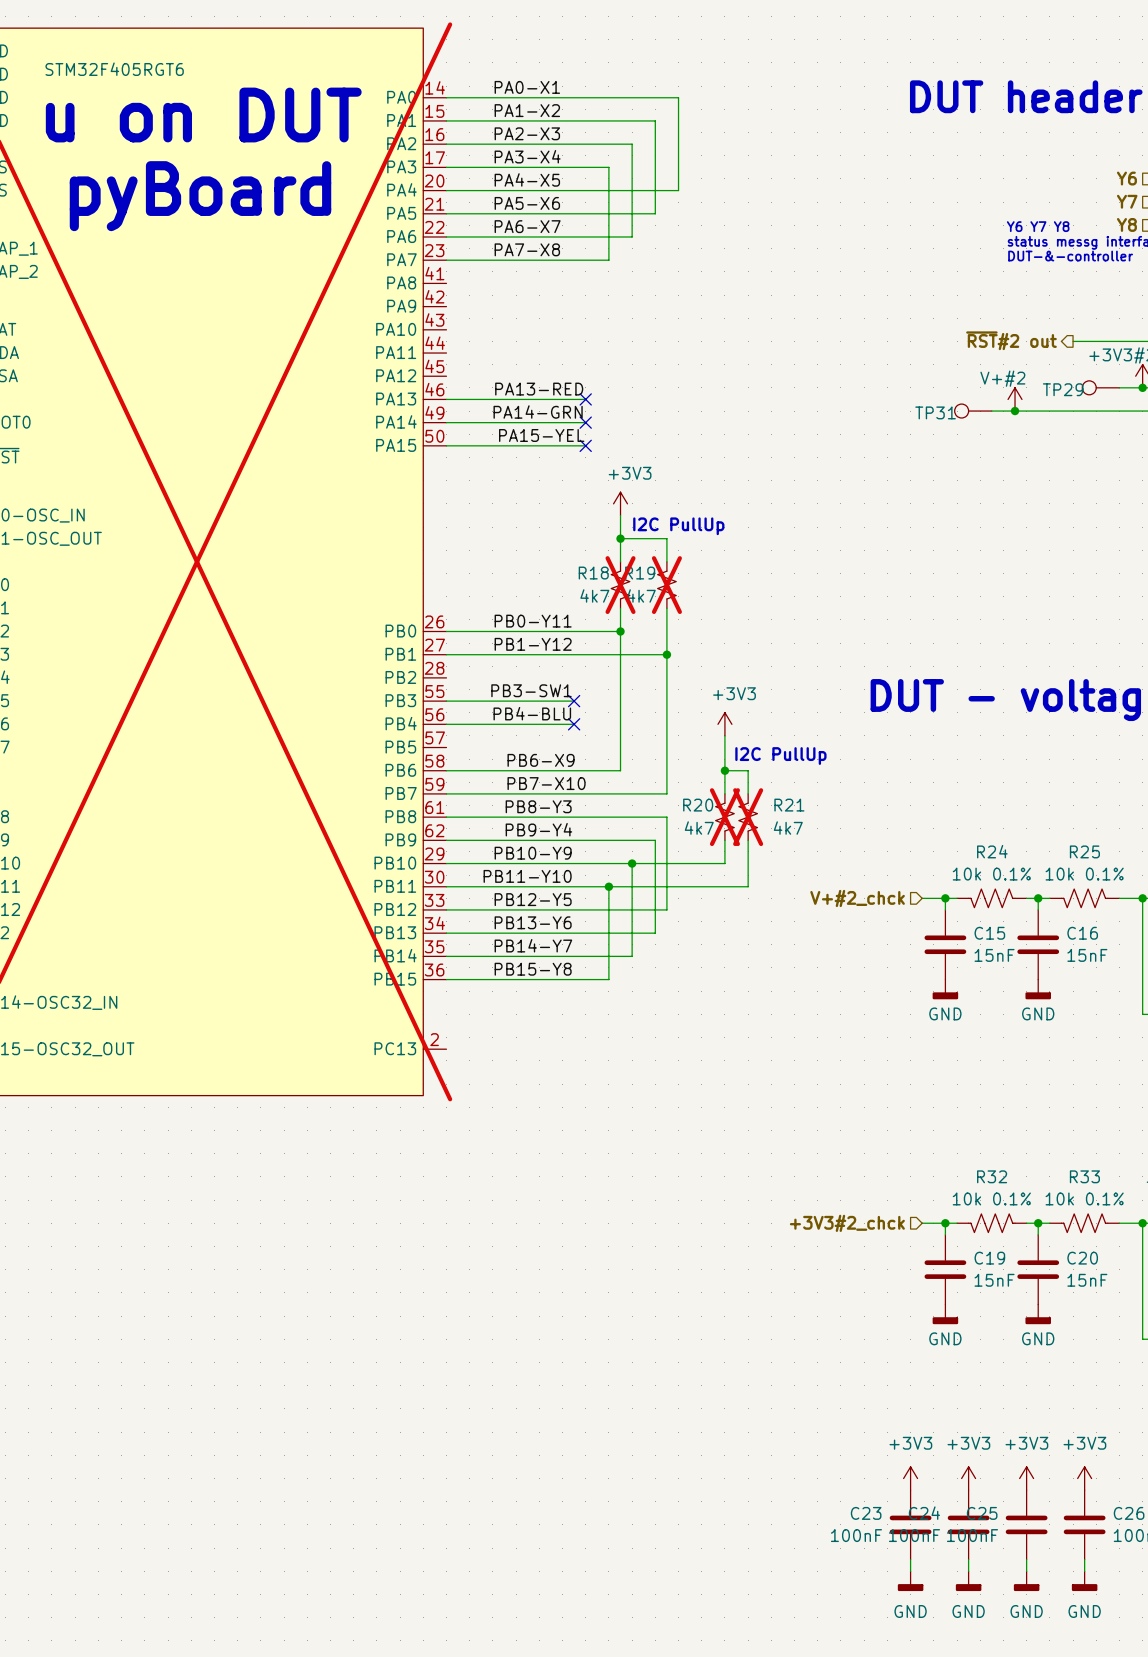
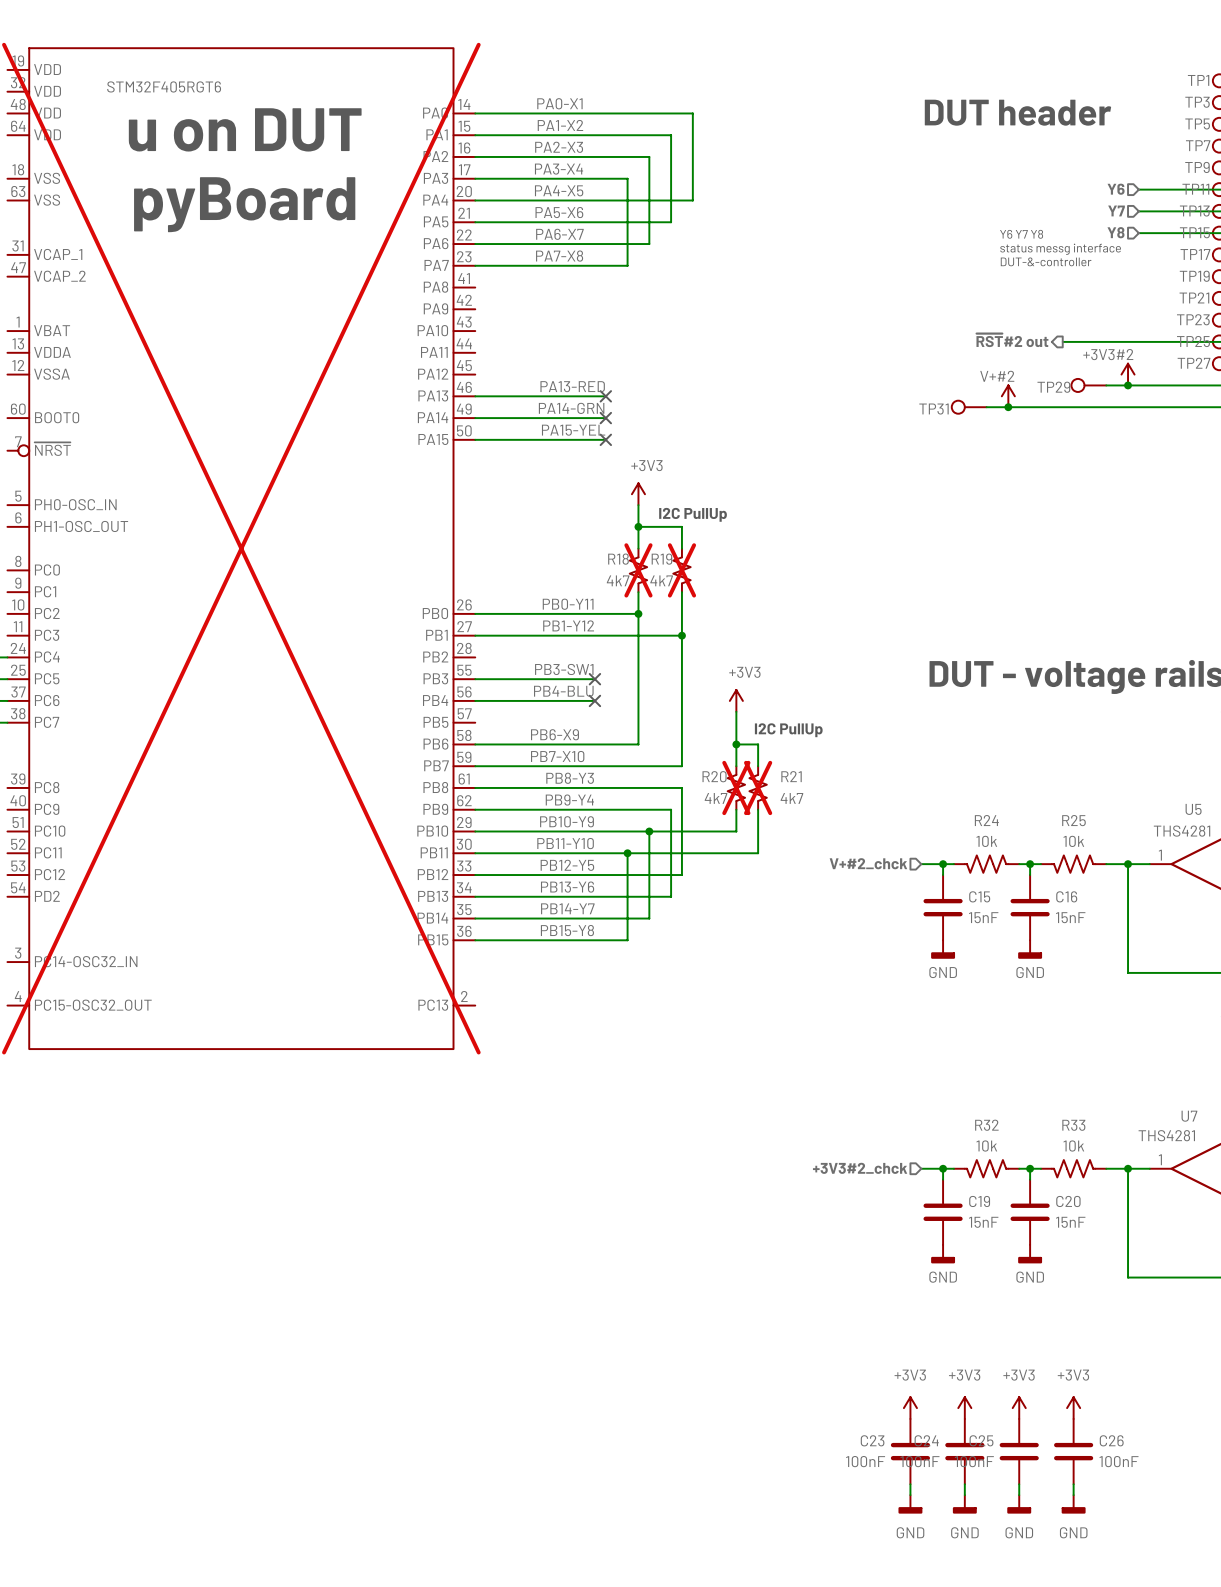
R24 value: 10k 0.1% (991, 874) -> 10k (986, 841)
R25 value: 10k 0.1% (1084, 874) -> 10k (1073, 841)
R32 value: 10k 0.1% (991, 1198) -> 10k (986, 1146)
R33 value: 10k 0.1% (1084, 1198) -> 10k (1073, 1146)

